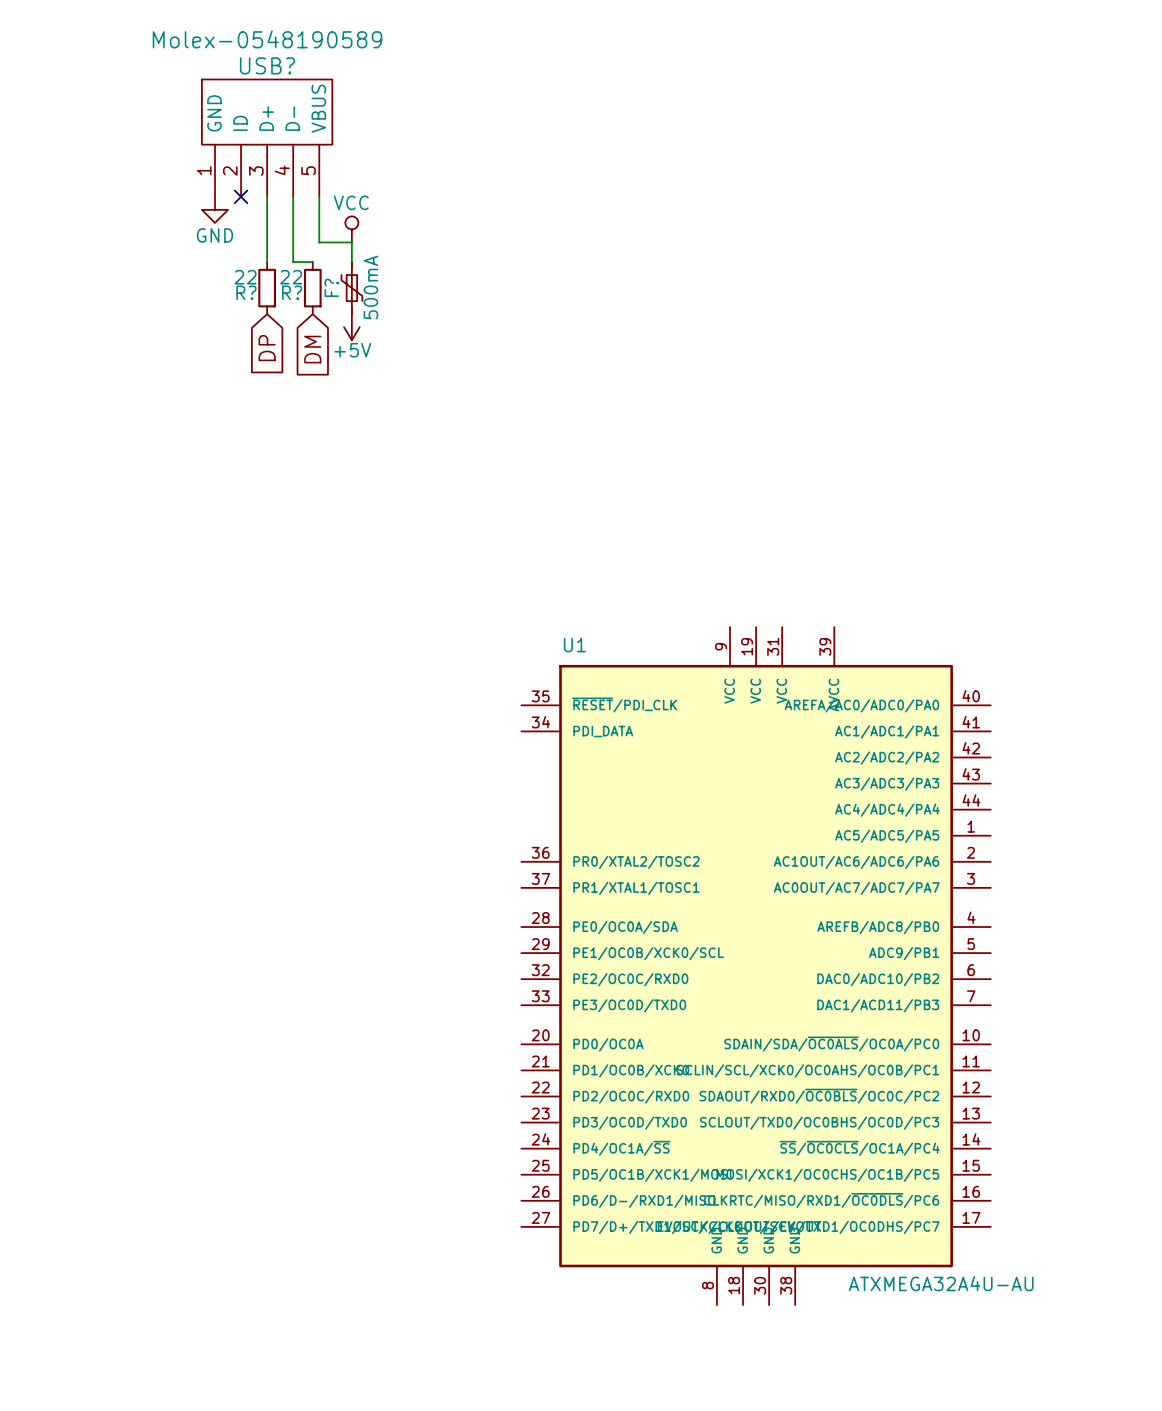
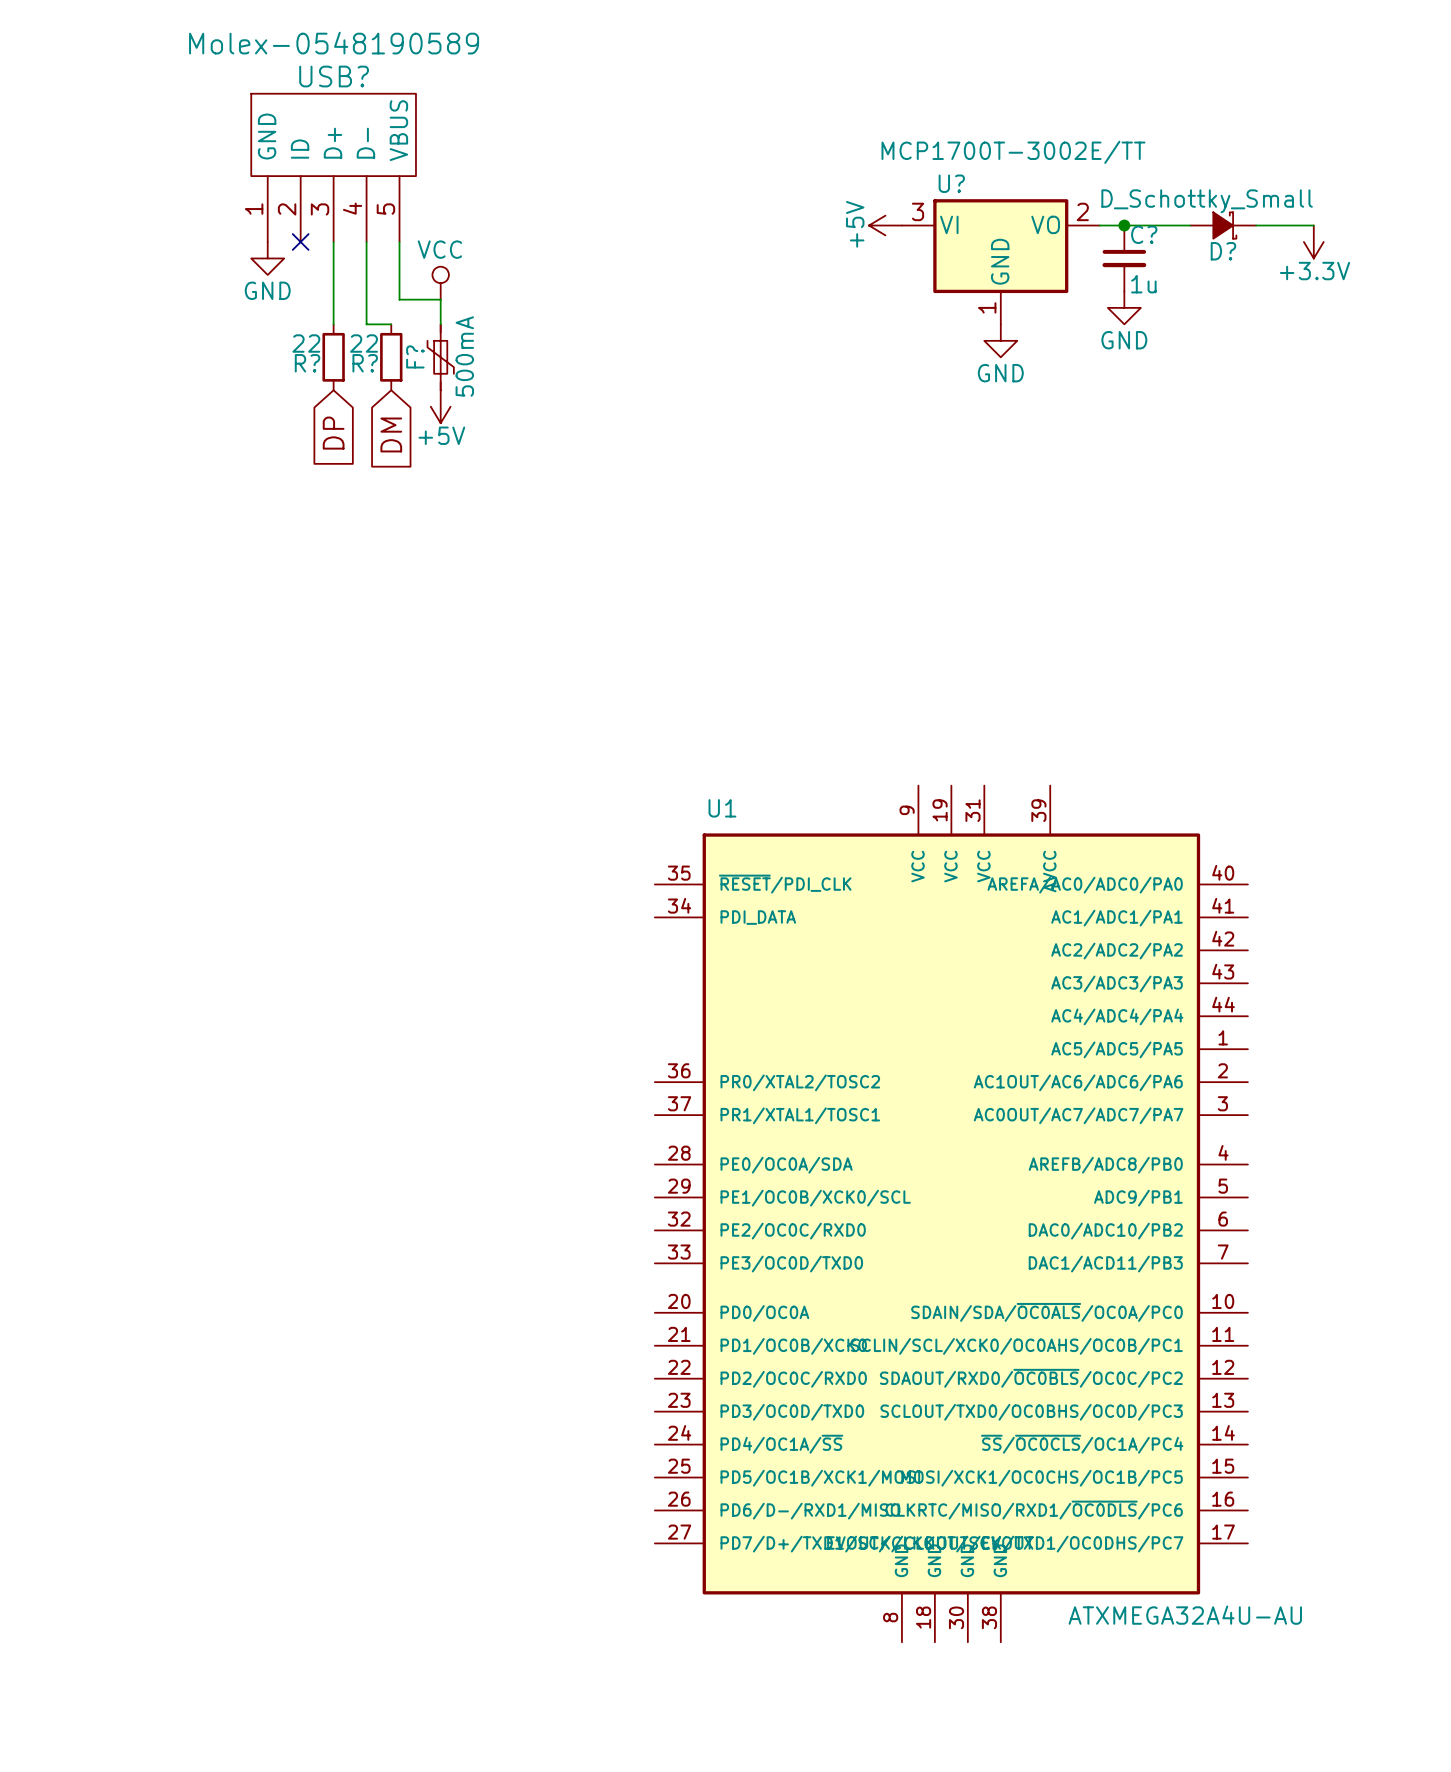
power symbol: none -> +5V (885, 225)
wire: none -> (1099, 225) (1190, 225)
junction: none -> (1124, 225)
D?: none -> D_Schottky_Small (1223, 225)
wire: none -> (1256, 225) (1313, 225)
power symbol: none -> +3.3V (1313, 241)
C?: none -> 1u (1124, 258)
U?: none -> MCP1700T-3002E/TT (1000, 261)
power symbol: none -> GND (1124, 307)
power symbol: none -> GND (1000, 340)

